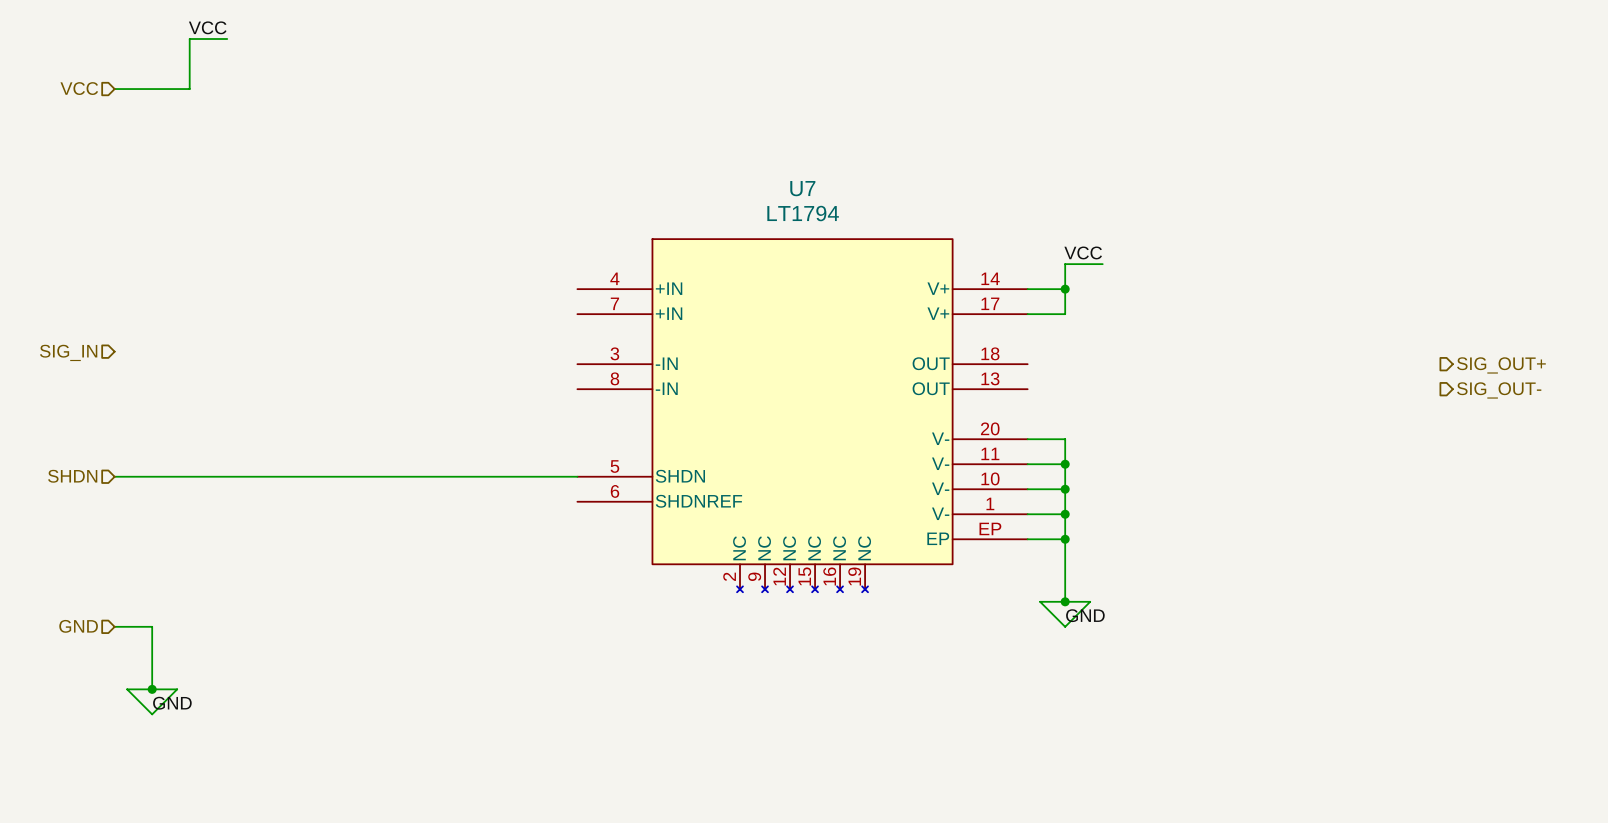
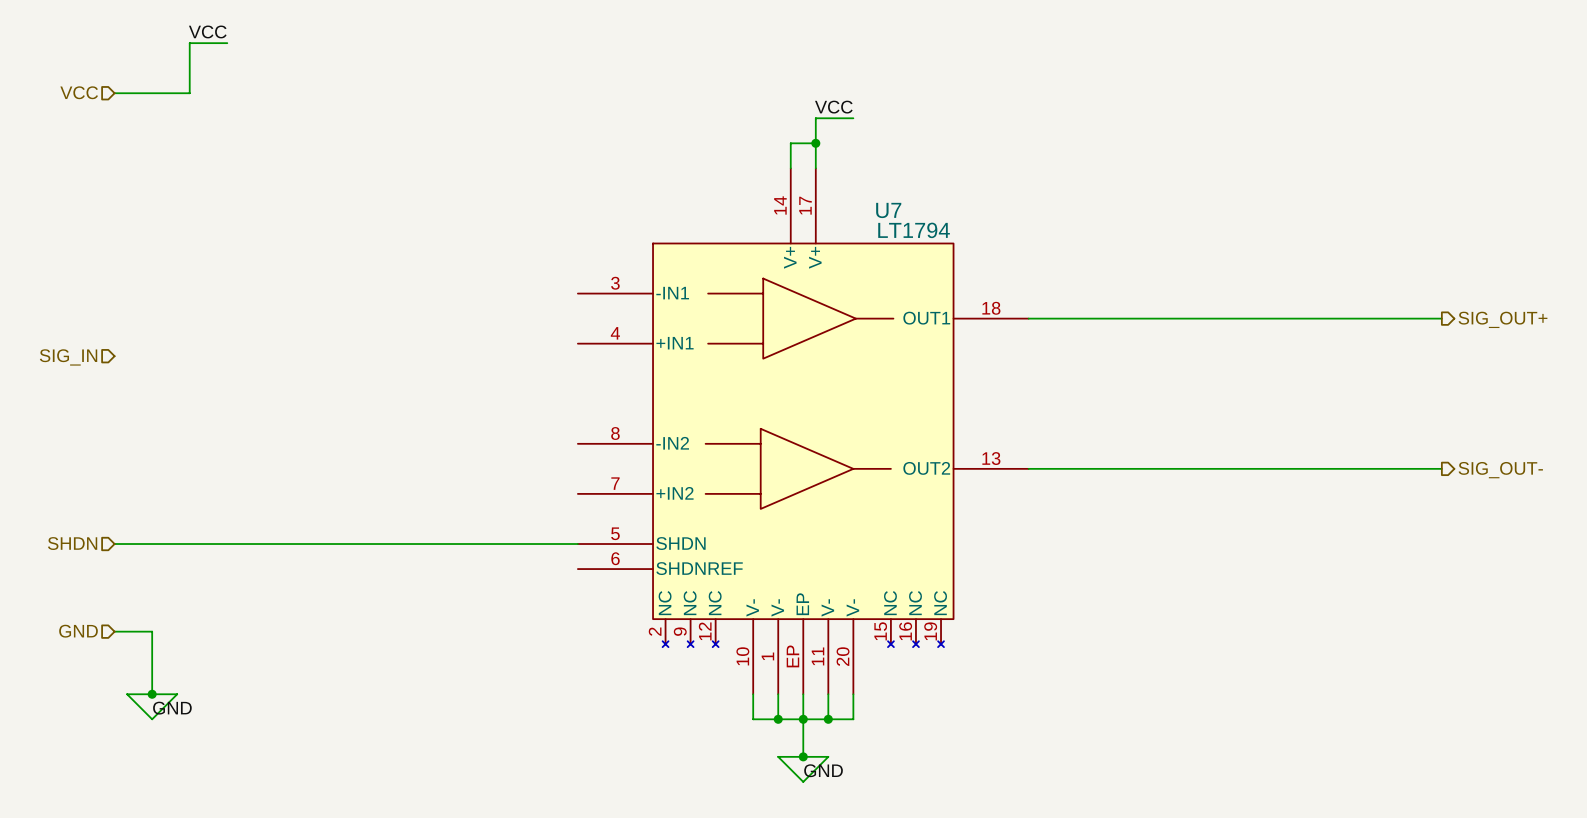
label: none -> VCC (833, 107)
wire: none -> (853, 118) (815, 118) (815, 168)
wire: none -> (815, 143) (790, 143) (790, 168)
junction: none -> (815, 143)
U7 name position: U7 (802, 188) -> U7 (888, 210)
U7 value position: LT1794 (803, 213) -> LT1794 (914, 230)
U7 symbol: [577, 239, 1028, 593] -> [577, 168, 1029, 695]
label: VCC (1083, 252) -> none
wire: (1102, 264) (1065, 264) (1065, 314) -> (1441, 318) (1066, 318)
wire: (1027, 289) (1065, 289) -> none
junction: (1065, 289) -> none
hierarchical label position: SIG_OUT+ (1501, 365) -> SIG_OUT+ (1503, 319)
hierarchical label position: SIG_OUT- (1499, 390) -> SIG_OUT- (1500, 470)
wire: (1027, 439) (1065, 439) (1065, 601) -> none
wire: none -> (1066, 468) (1441, 468)
junction: (1065, 464) -> none
hierarchical label position: SHDN (72, 476) -> SHDN (72, 543)
wire: (114, 476) (577, 476) -> (114, 544) (577, 544)
wire: (1027, 489) (1065, 489) -> none
junction: (1065, 489) -> none
wire: (1027, 514) (1065, 514) -> none
junction: (1065, 514) -> none
wire: (1027, 539) (1065, 539) -> none
junction: (1065, 539) -> none
wire: (1040, 601) (1090, 601) (1065, 626) (1040, 601) -> none
junction: (1065, 601) -> none
label: GND (1085, 615) -> none
wire: none -> (753, 694) (753, 719) (853, 719) (853, 694)
wire: none -> (778, 694) (778, 719)
wire: none -> (803, 694) (803, 756)
wire: none -> (828, 694) (828, 719)
junction: none -> (778, 719)
junction: none -> (803, 719)
junction: none -> (828, 719)
wire: none -> (778, 756) (828, 756) (803, 781) (778, 756)
junction: none -> (803, 756)
label: none -> GND (823, 770)

